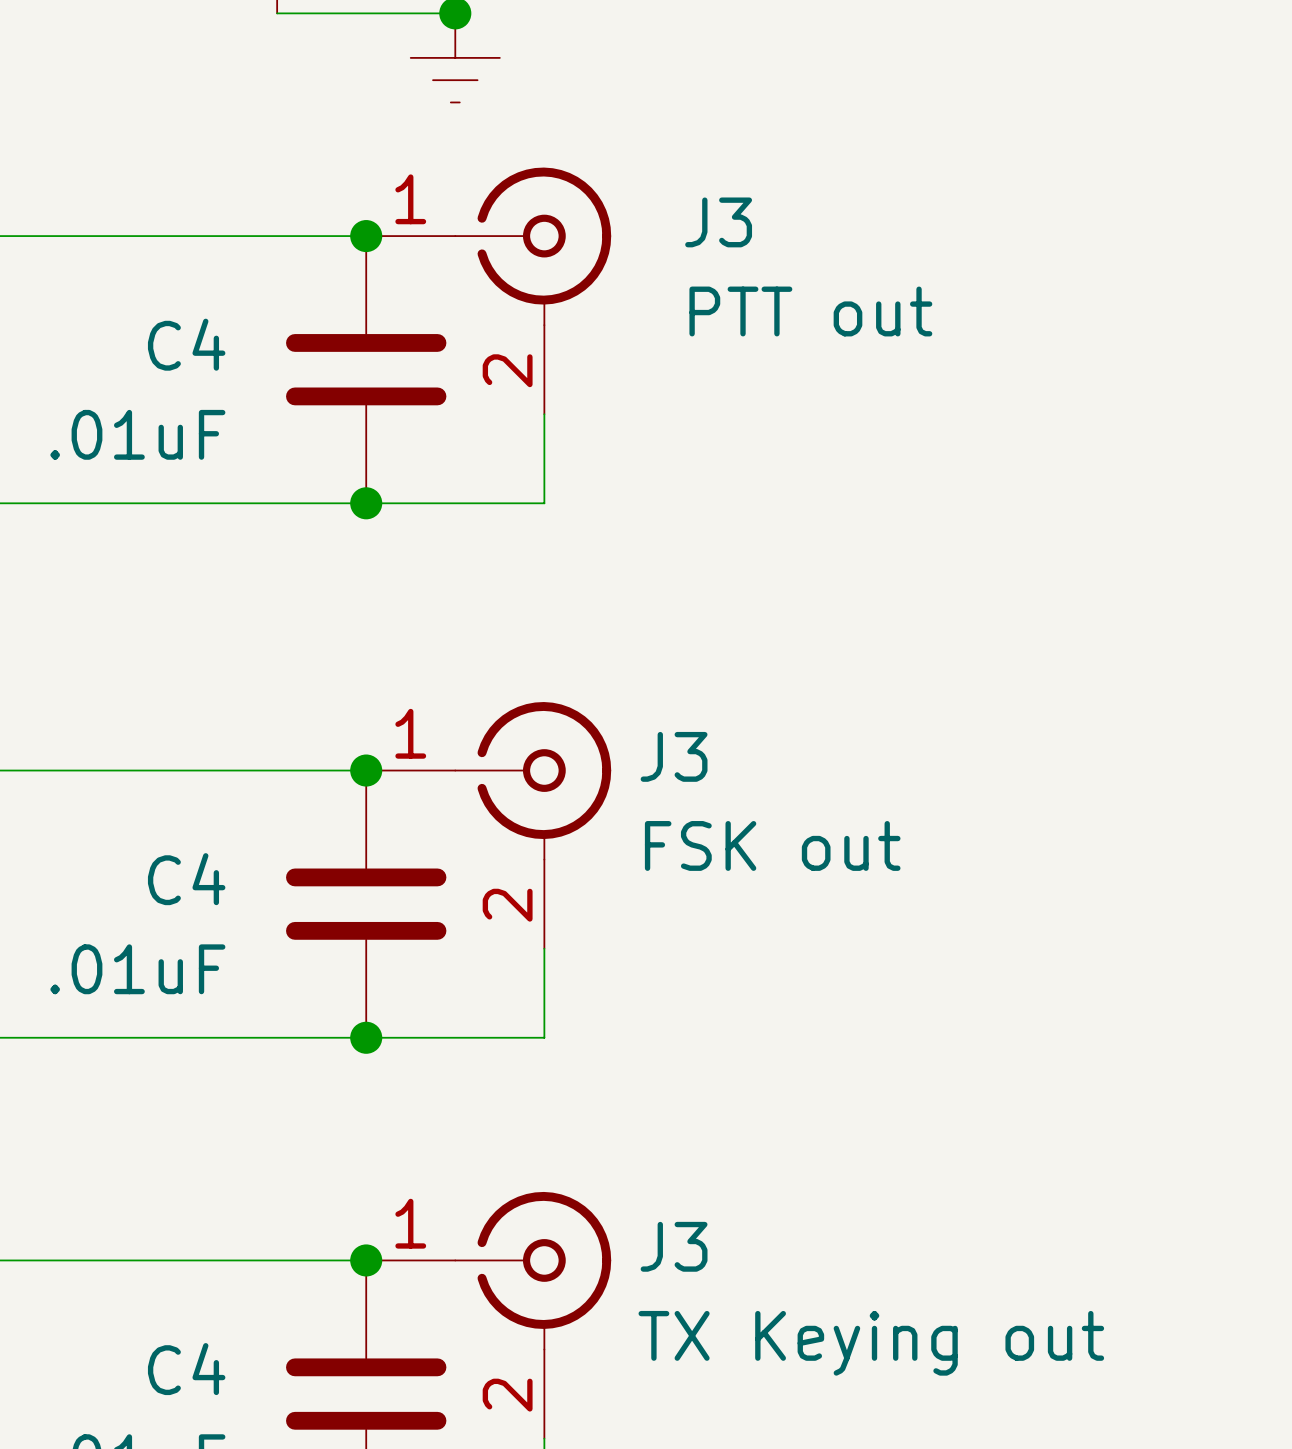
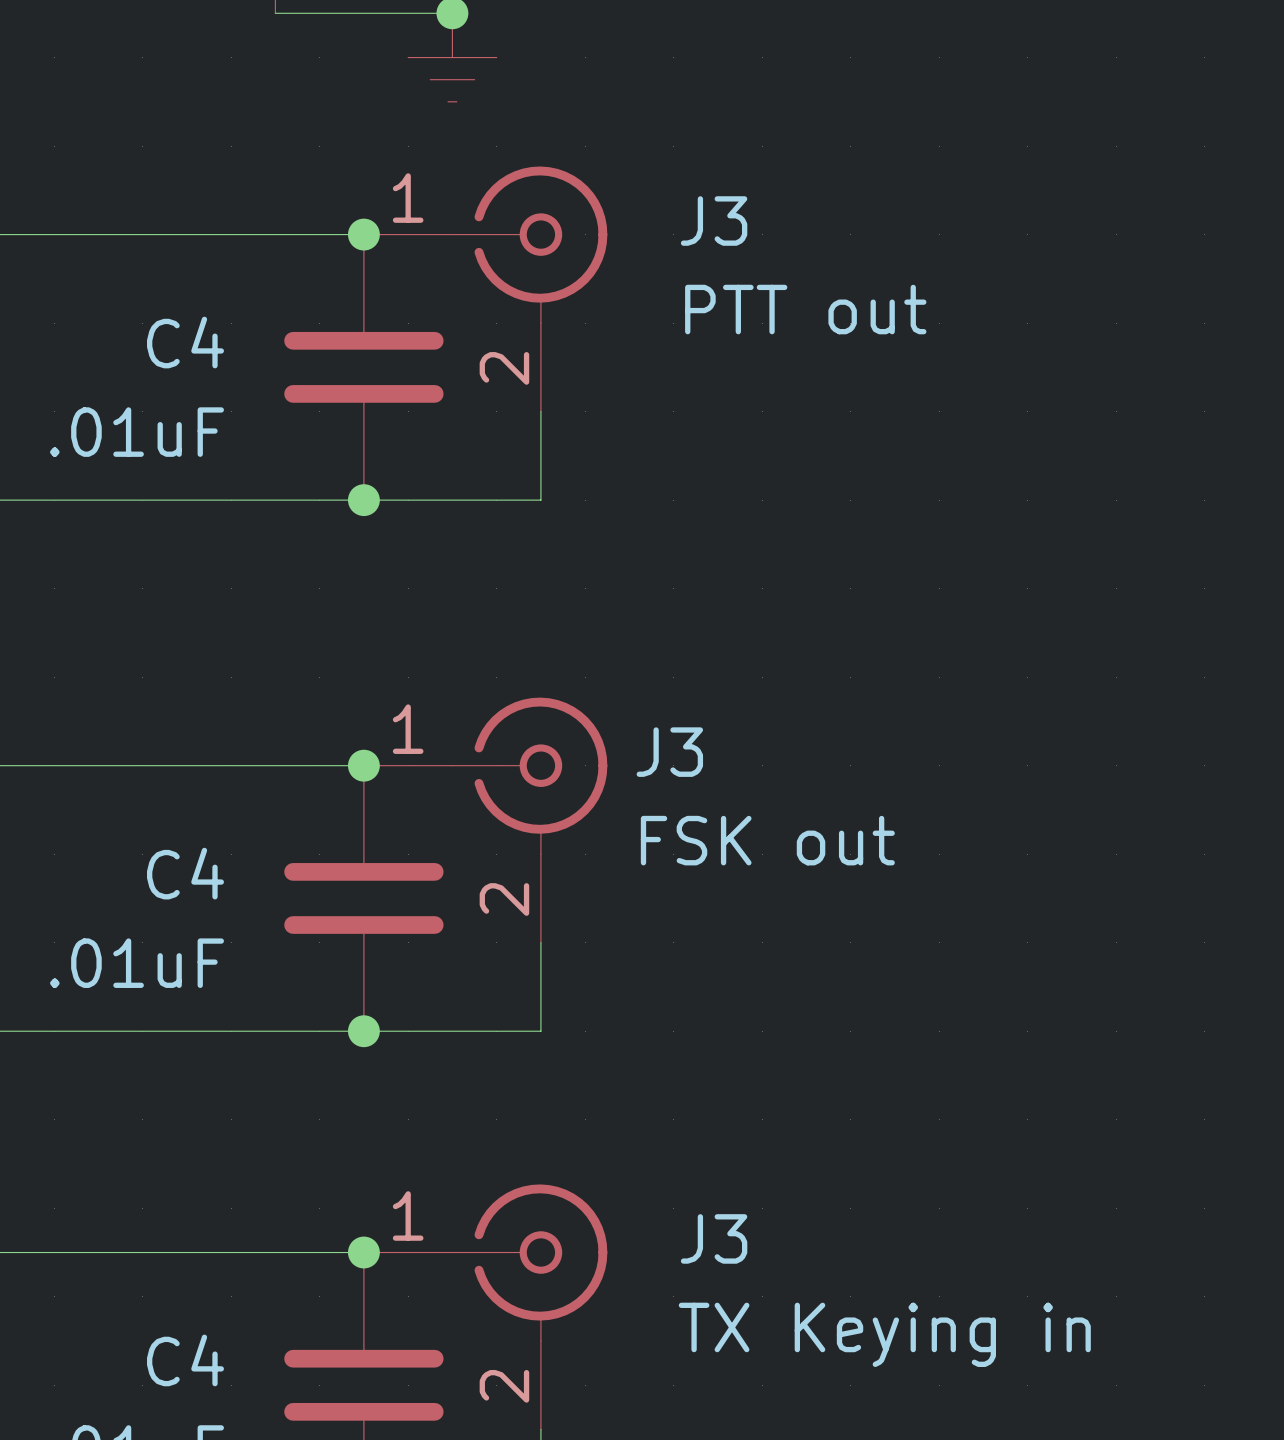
J3 name position: J3 (674, 1246) -> J3 (714, 1238)
J3 value: TX Keying out (871, 1343) -> TX Keying in (884, 1334)

